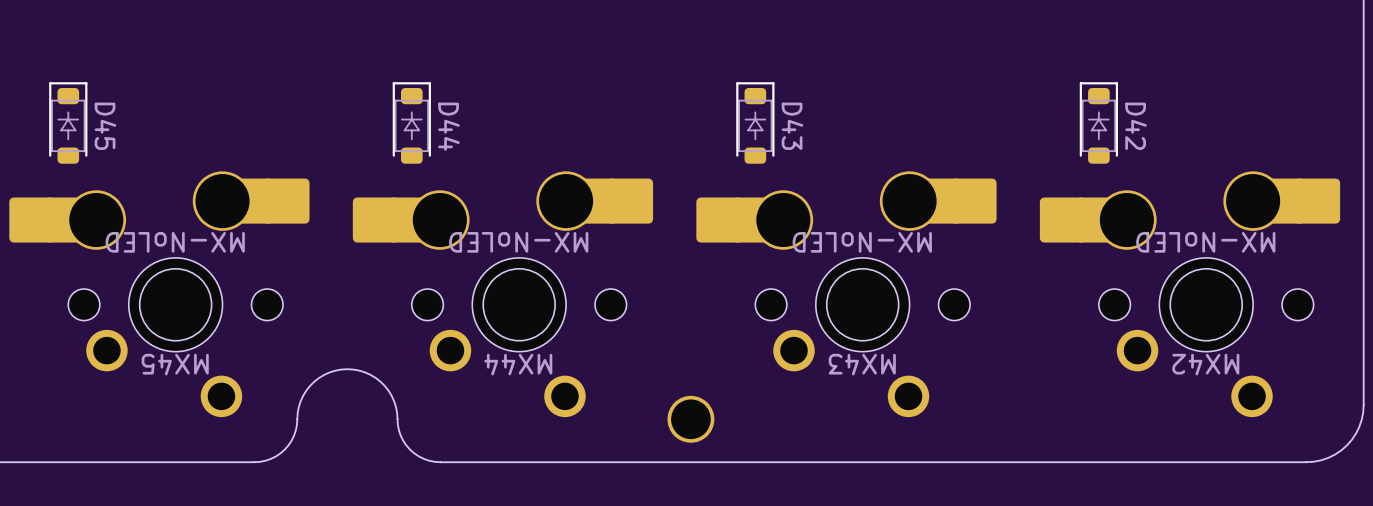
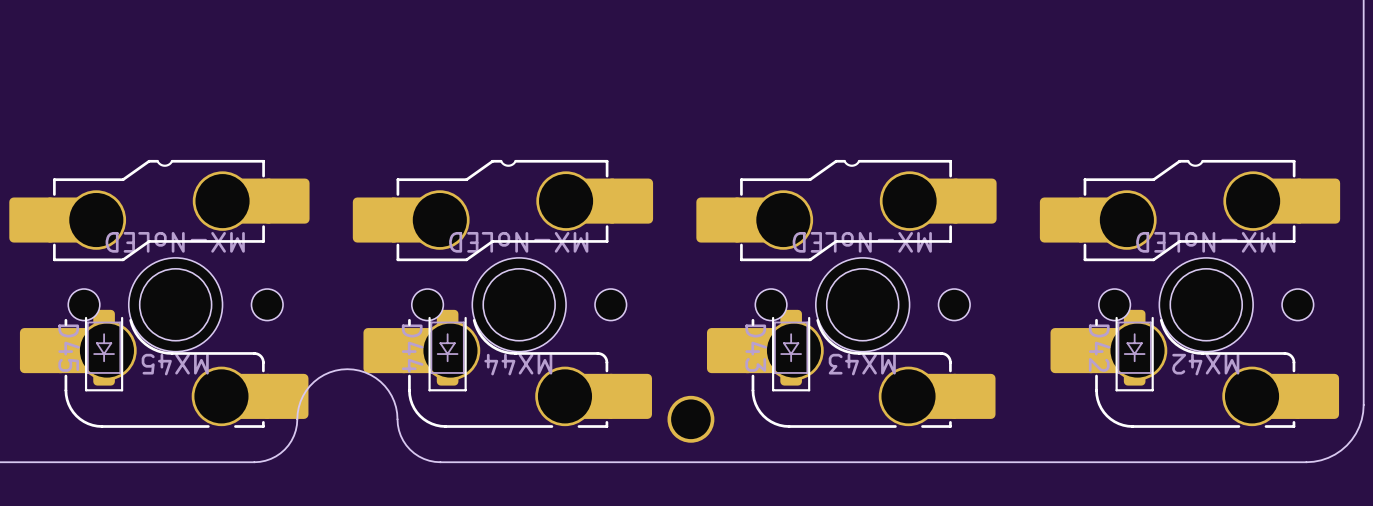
D45 rotation: 0° (68, 122) -> 180° (104, 350)
D45 position: (68, 122) -> (104, 350)
D44 rotation: 0° (411, 122) -> 180° (447, 350)
D44 position: (411, 122) -> (447, 350)
D43 rotation: 0° (755, 122) -> 180° (791, 350)
D43 position: (755, 122) -> (791, 350)
D42 rotation: 0° (1098, 122) -> 180° (1134, 350)
D42 position: (1098, 122) -> (1134, 350)
MX45 footprint: [9, 171, 310, 418] -> [9, 159, 310, 428]
MX44 footprint: [352, 171, 654, 418] -> [352, 159, 654, 428]
MX43 footprint: [696, 171, 997, 418] -> [696, 159, 997, 428]
MX42 footprint: [1039, 171, 1341, 418] -> [1039, 159, 1341, 428]

